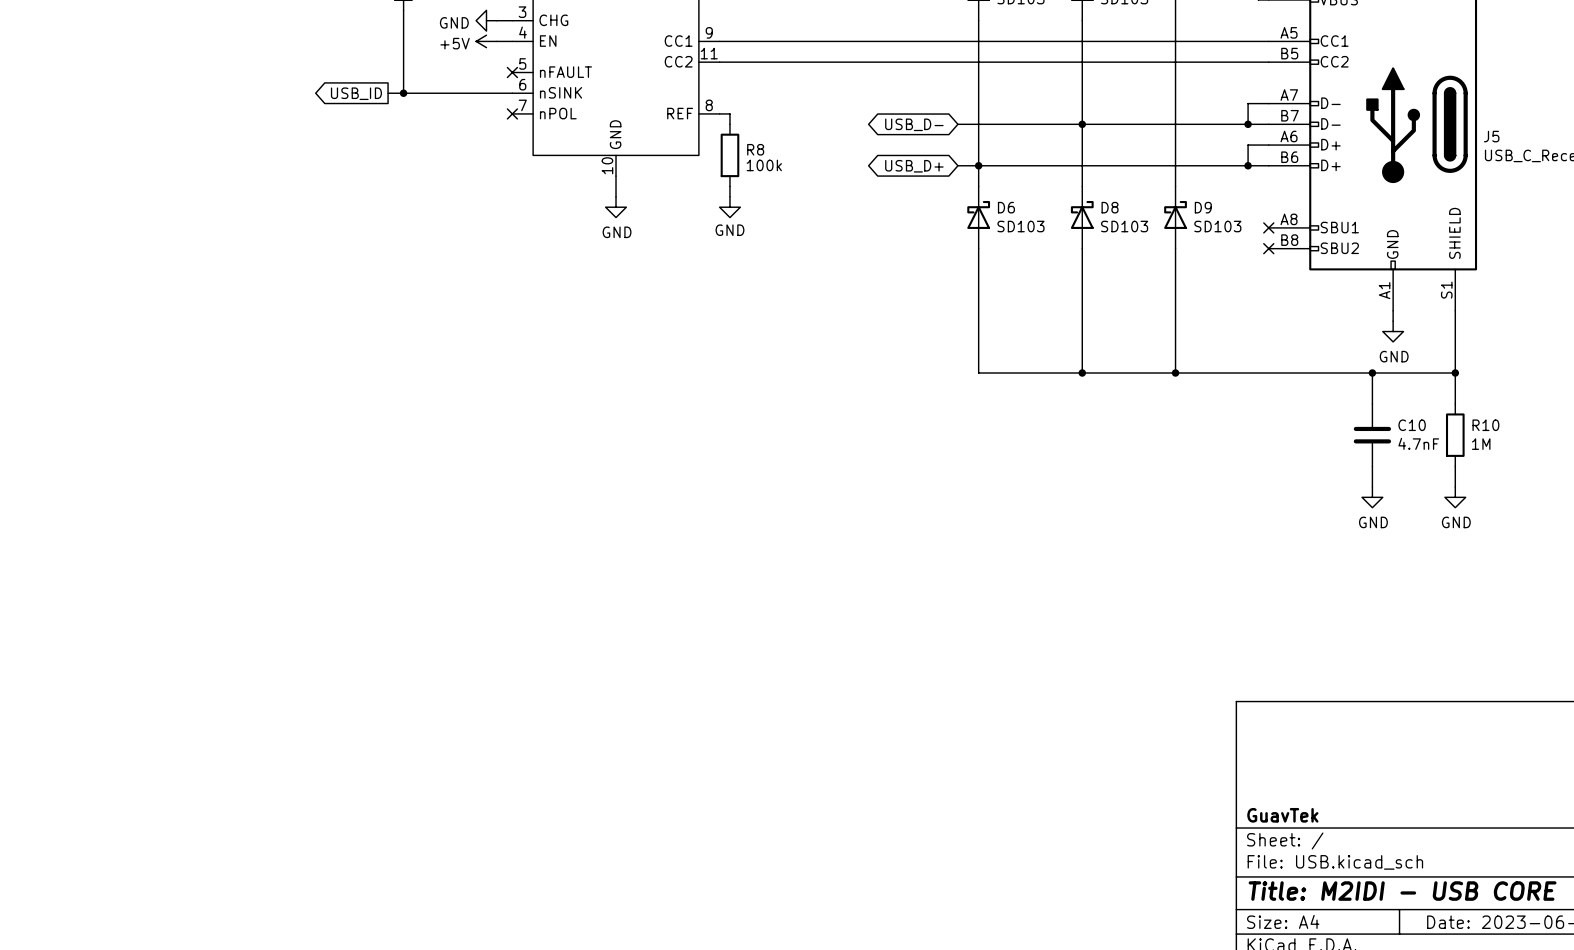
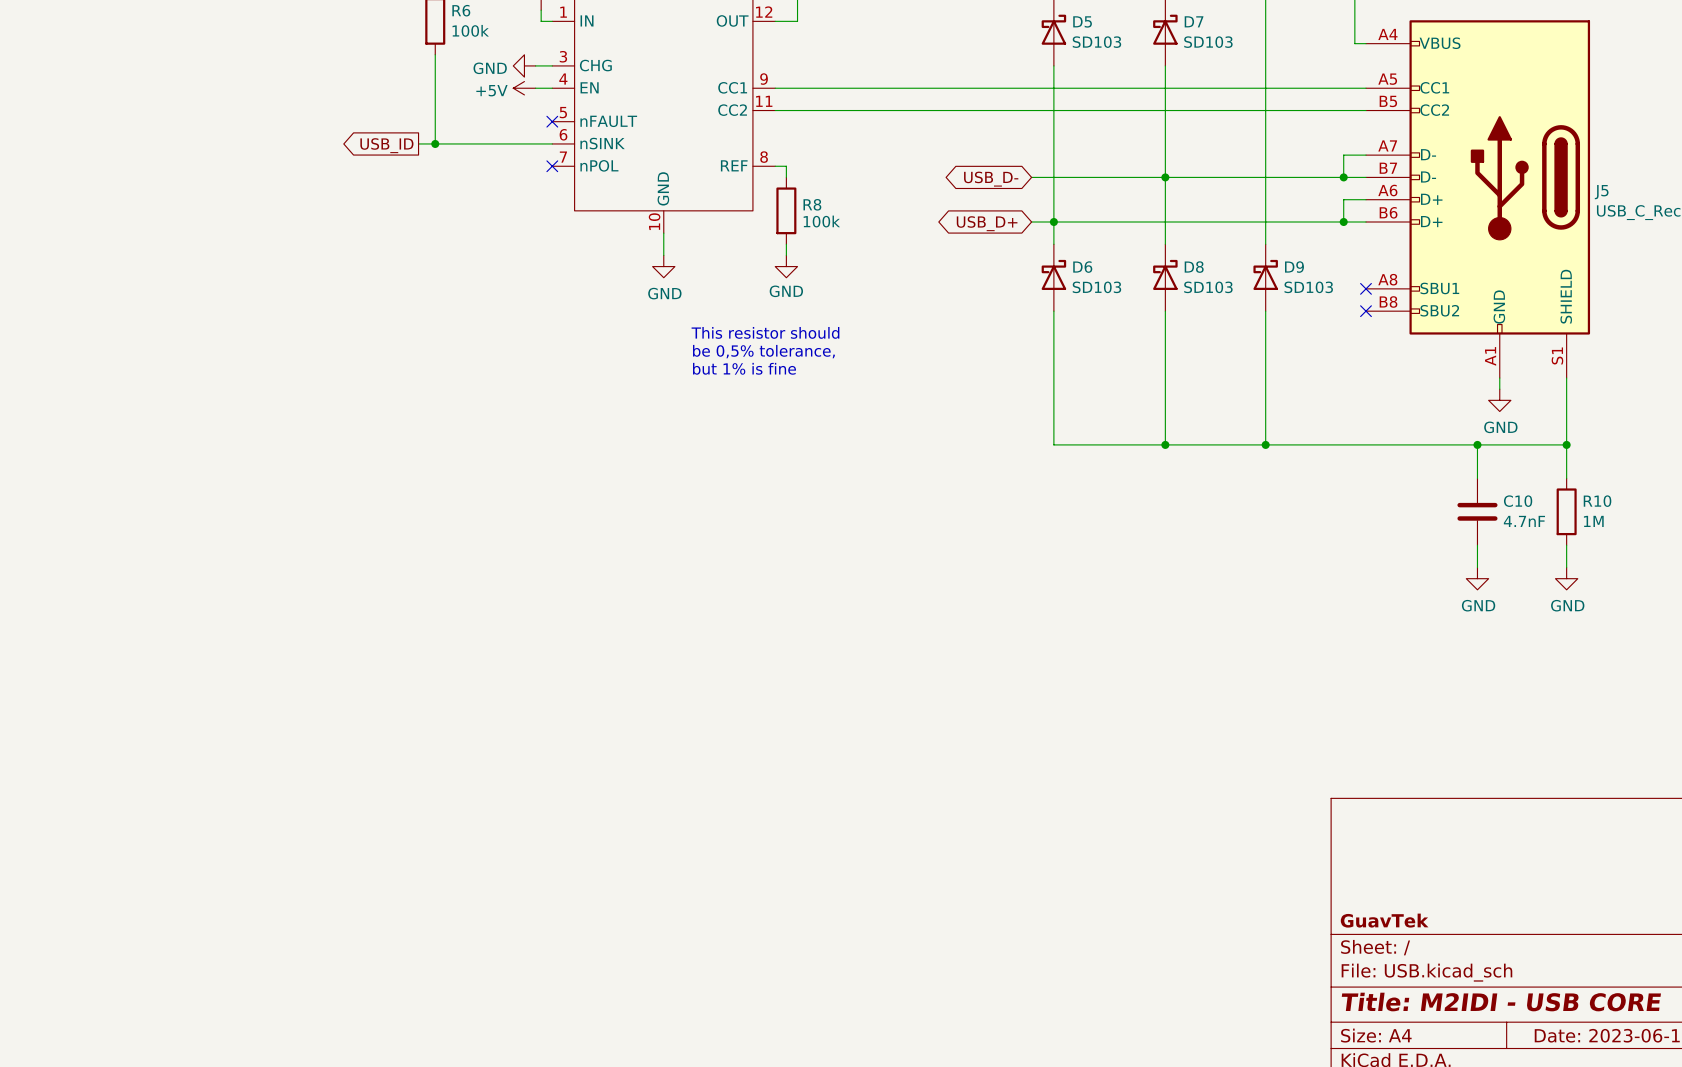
text: none -> This resistor should (765, 332)
text: none -> be 0,5% tolerance, (763, 351)
text: none -> but 1% is fine (744, 368)

